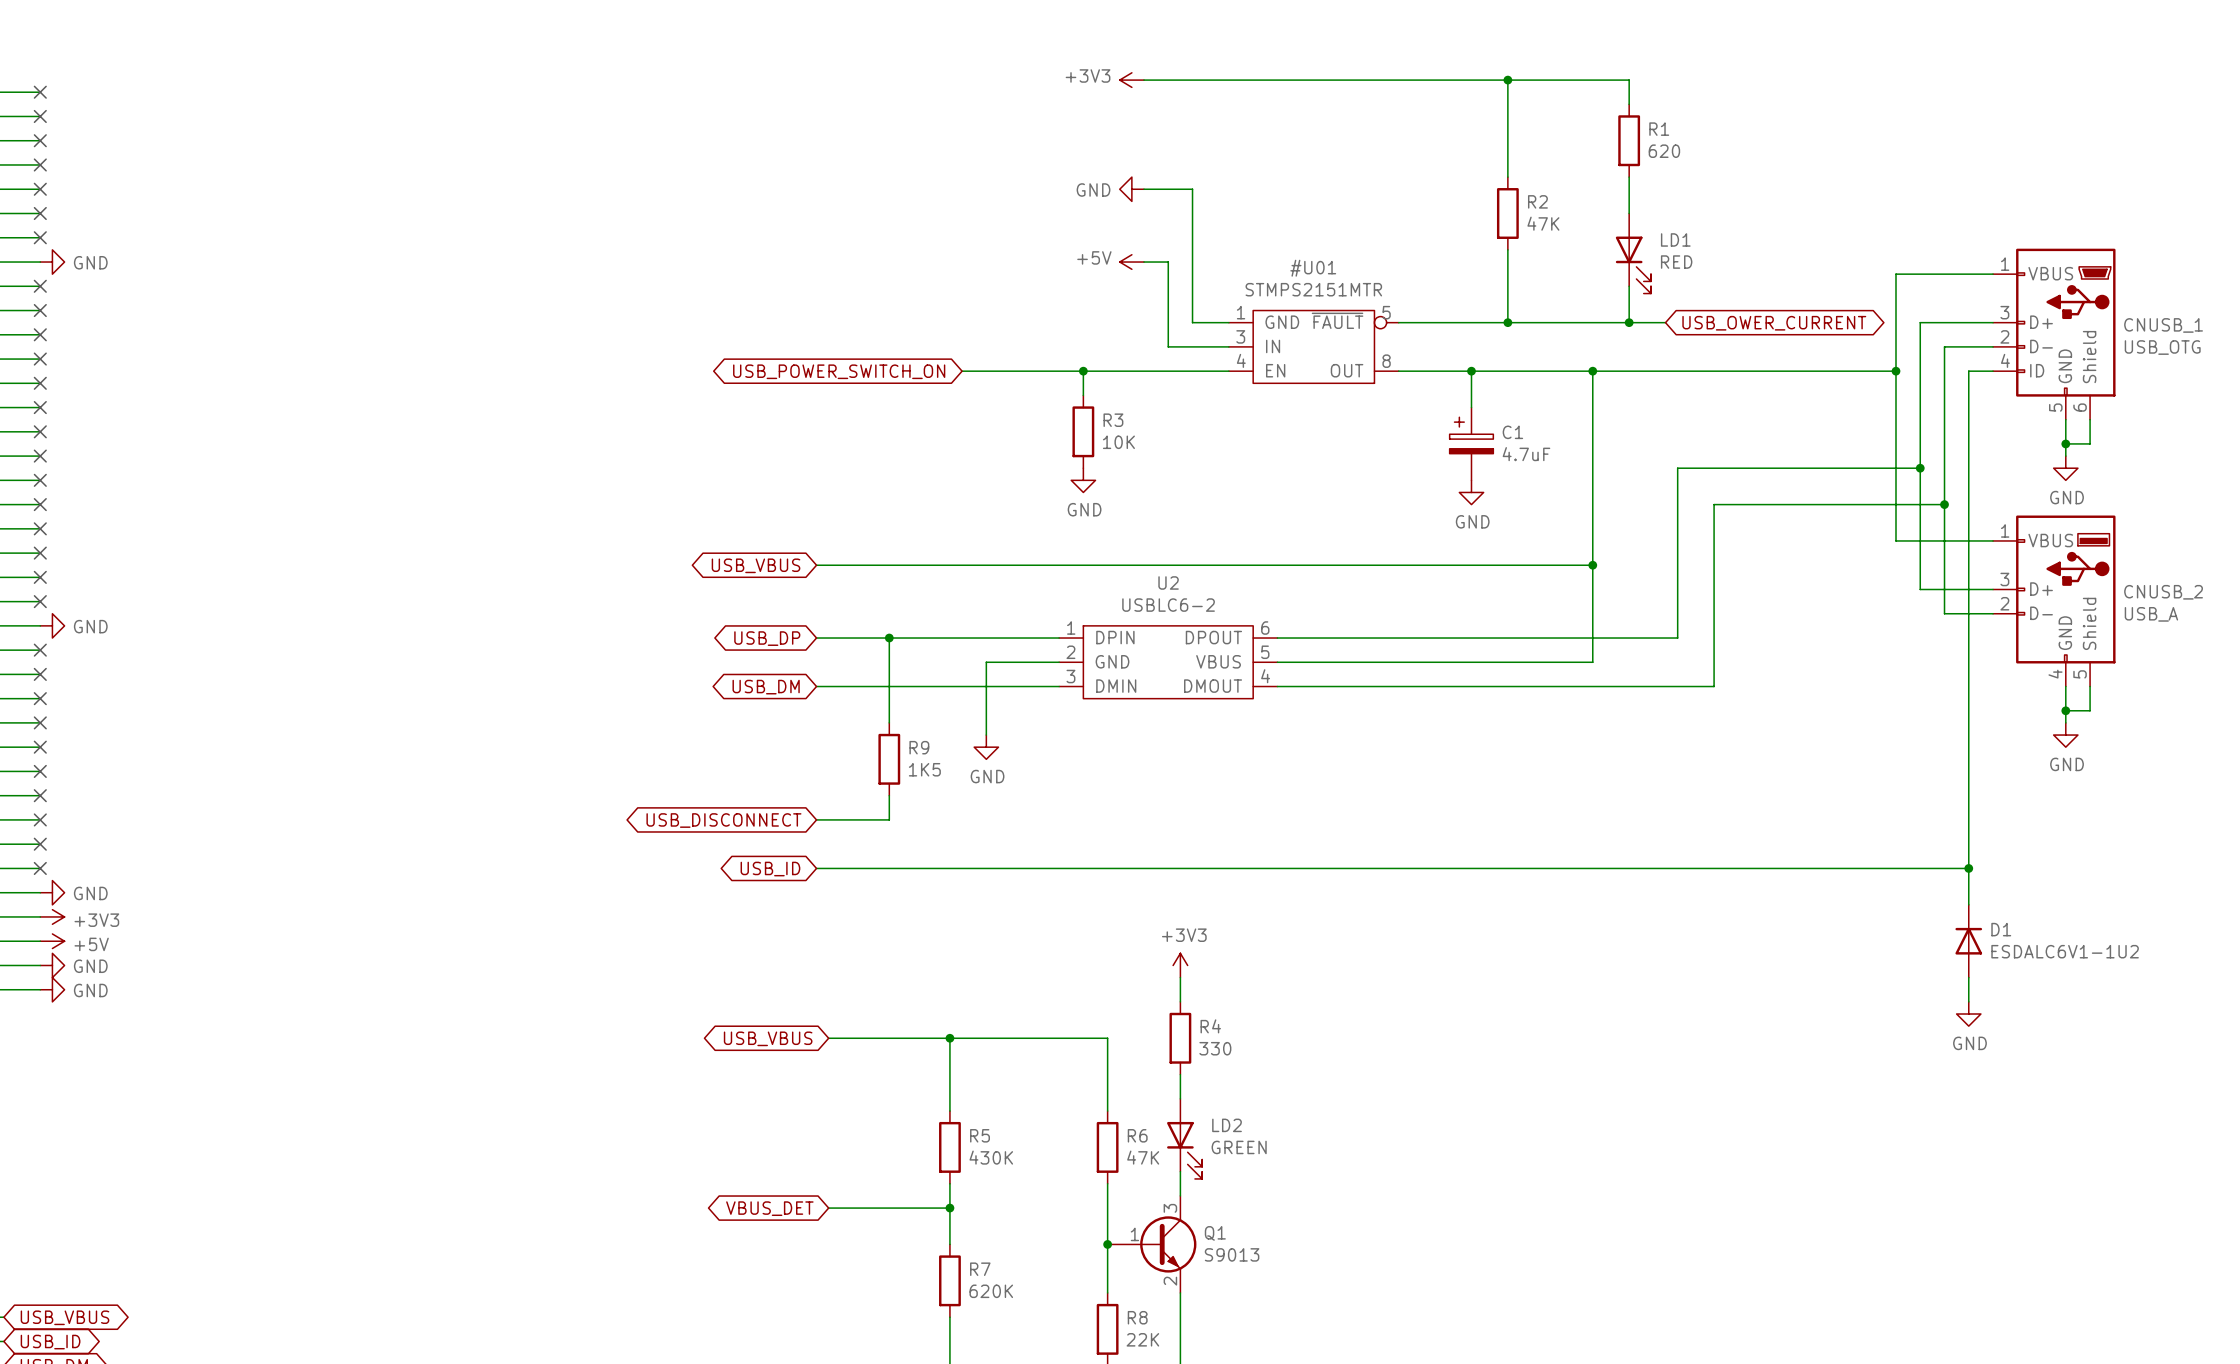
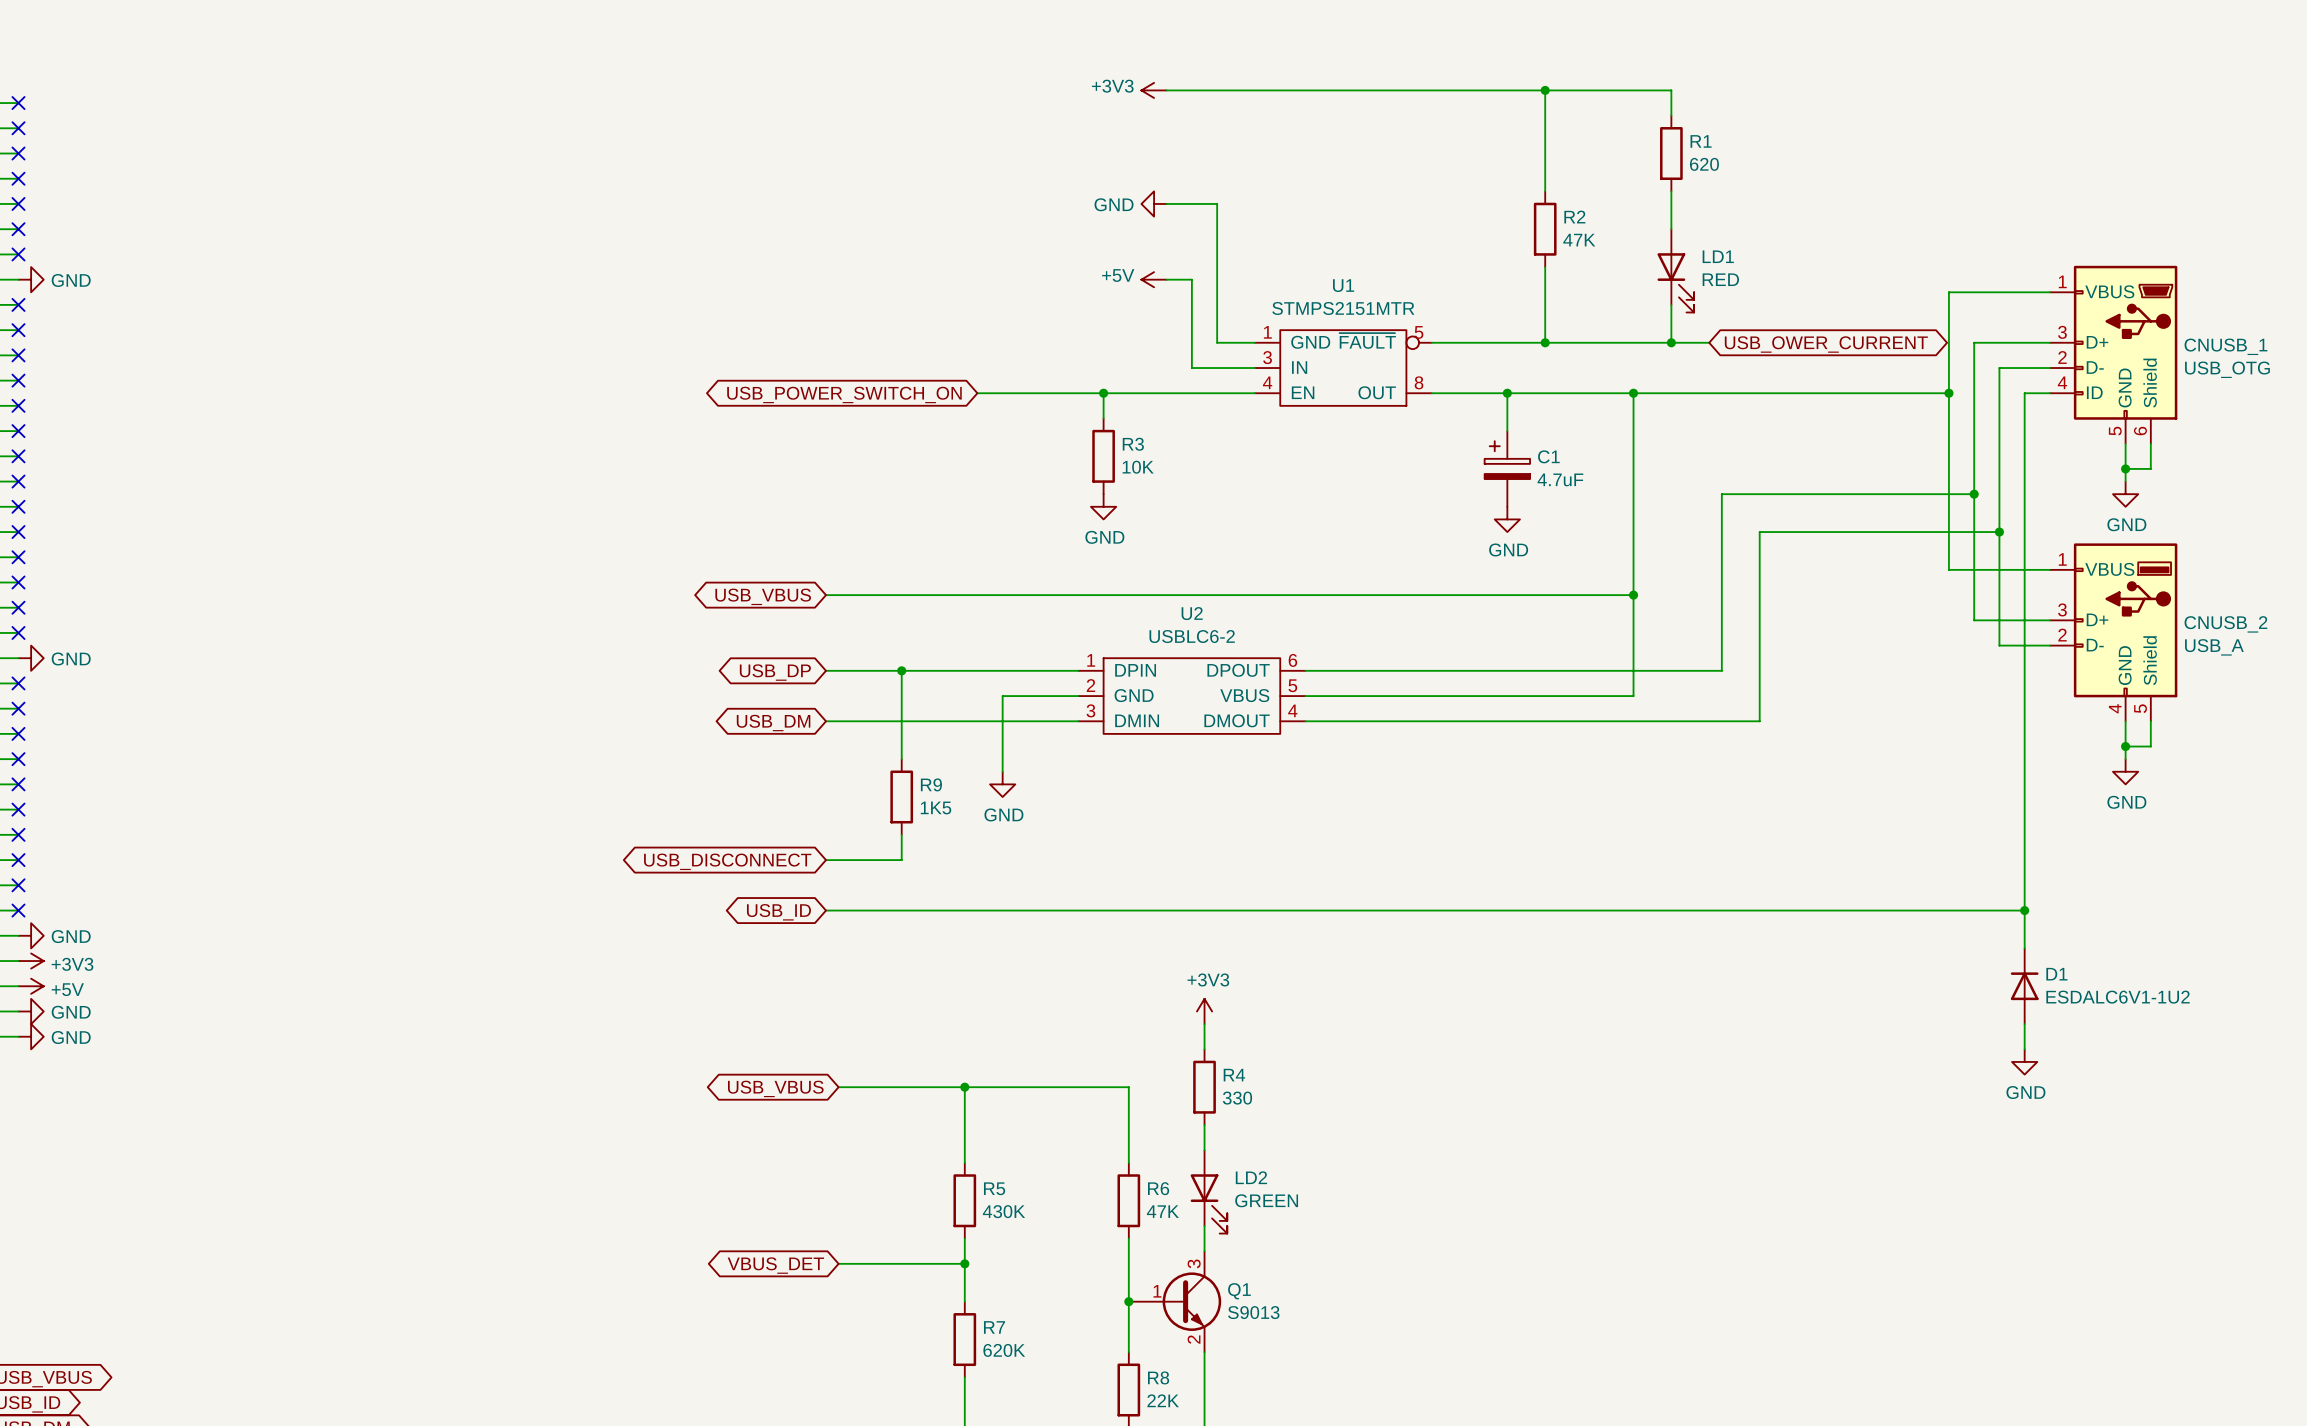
#U01: STMPS2151MTR (1313, 346) -> none
U1: none -> STMPS2151MTR (1343, 368)

